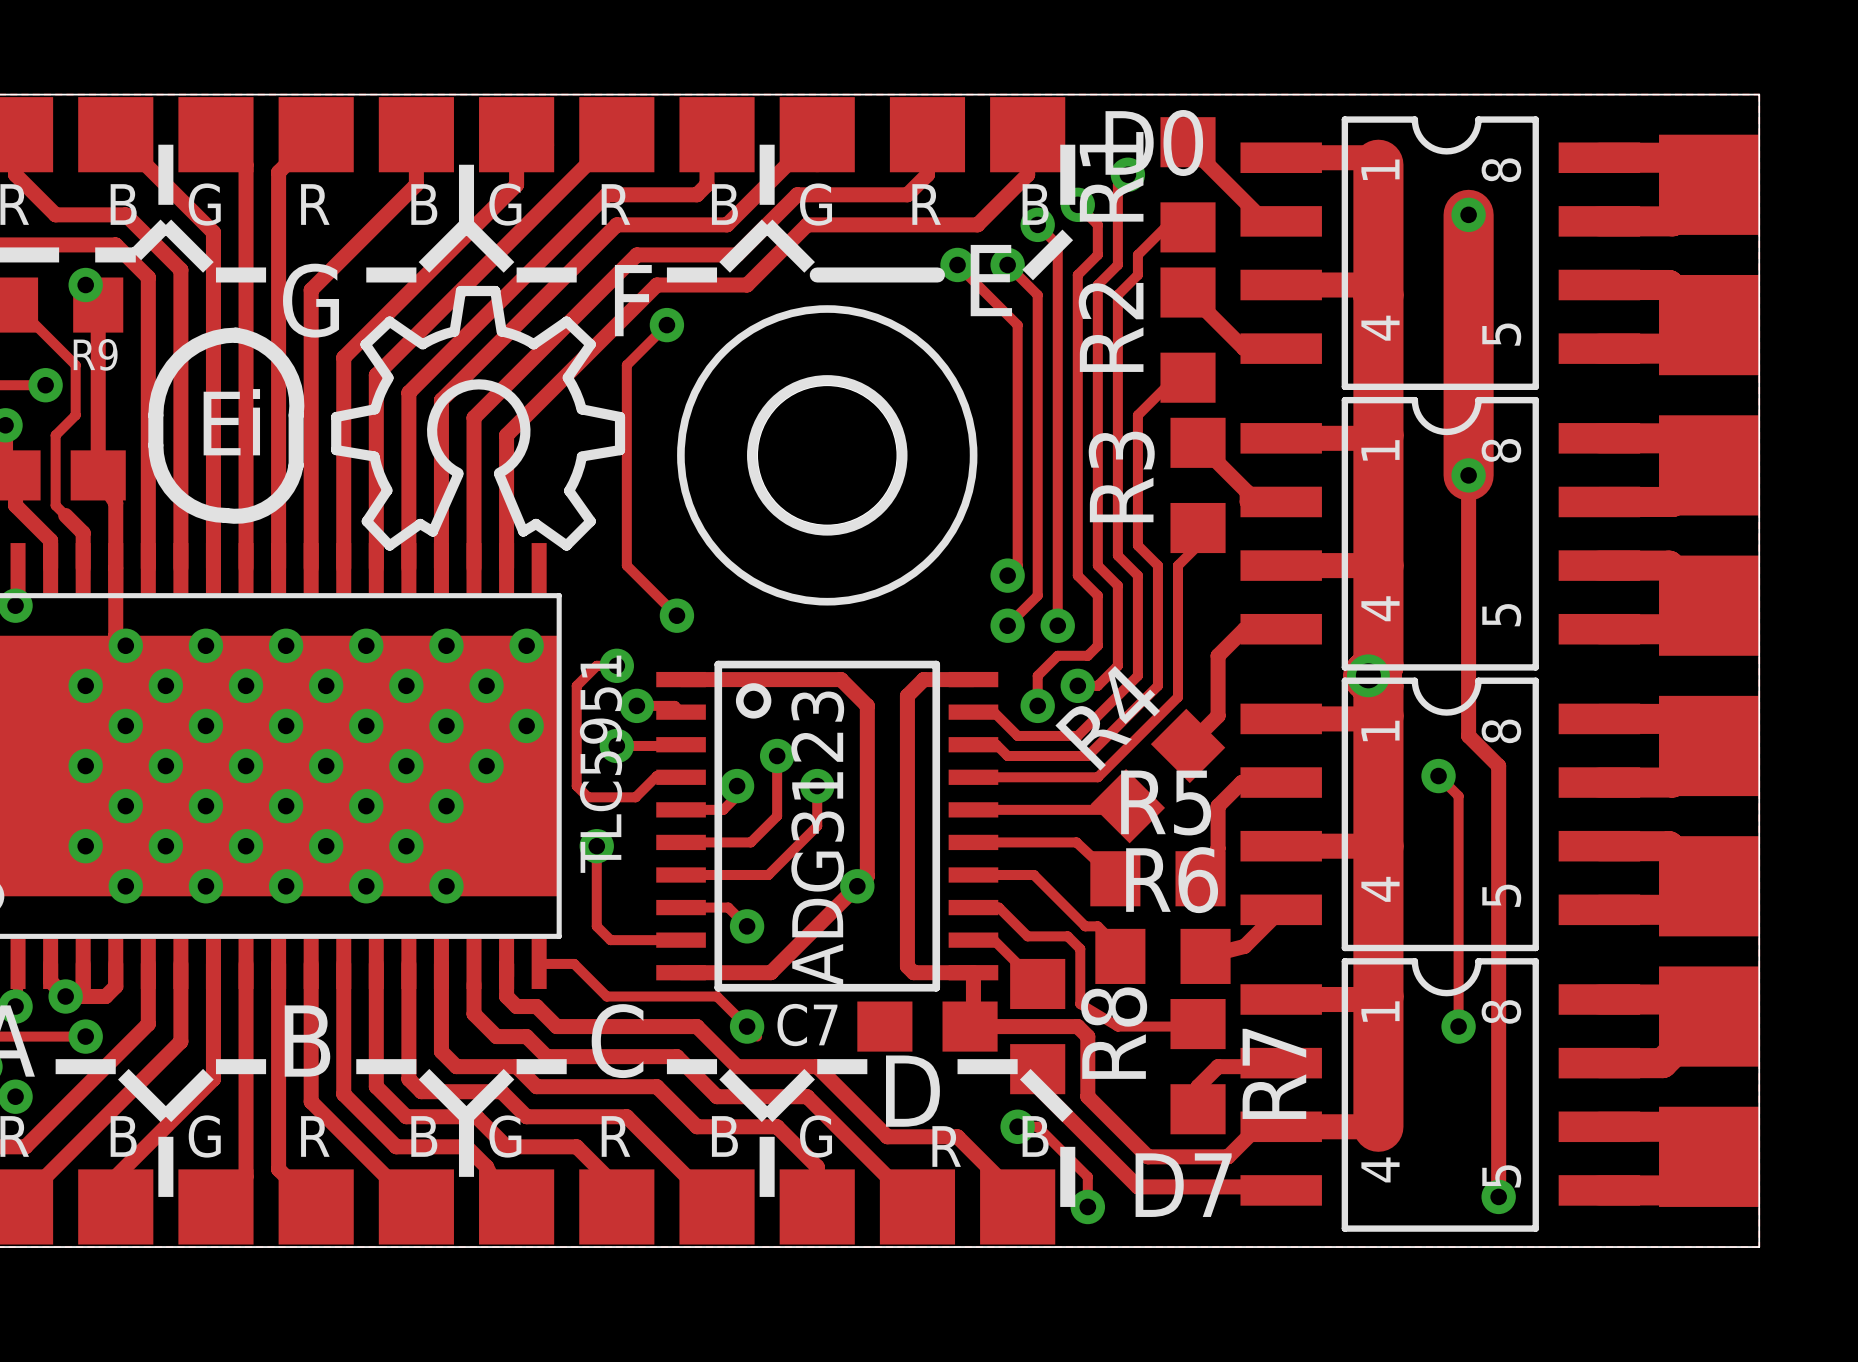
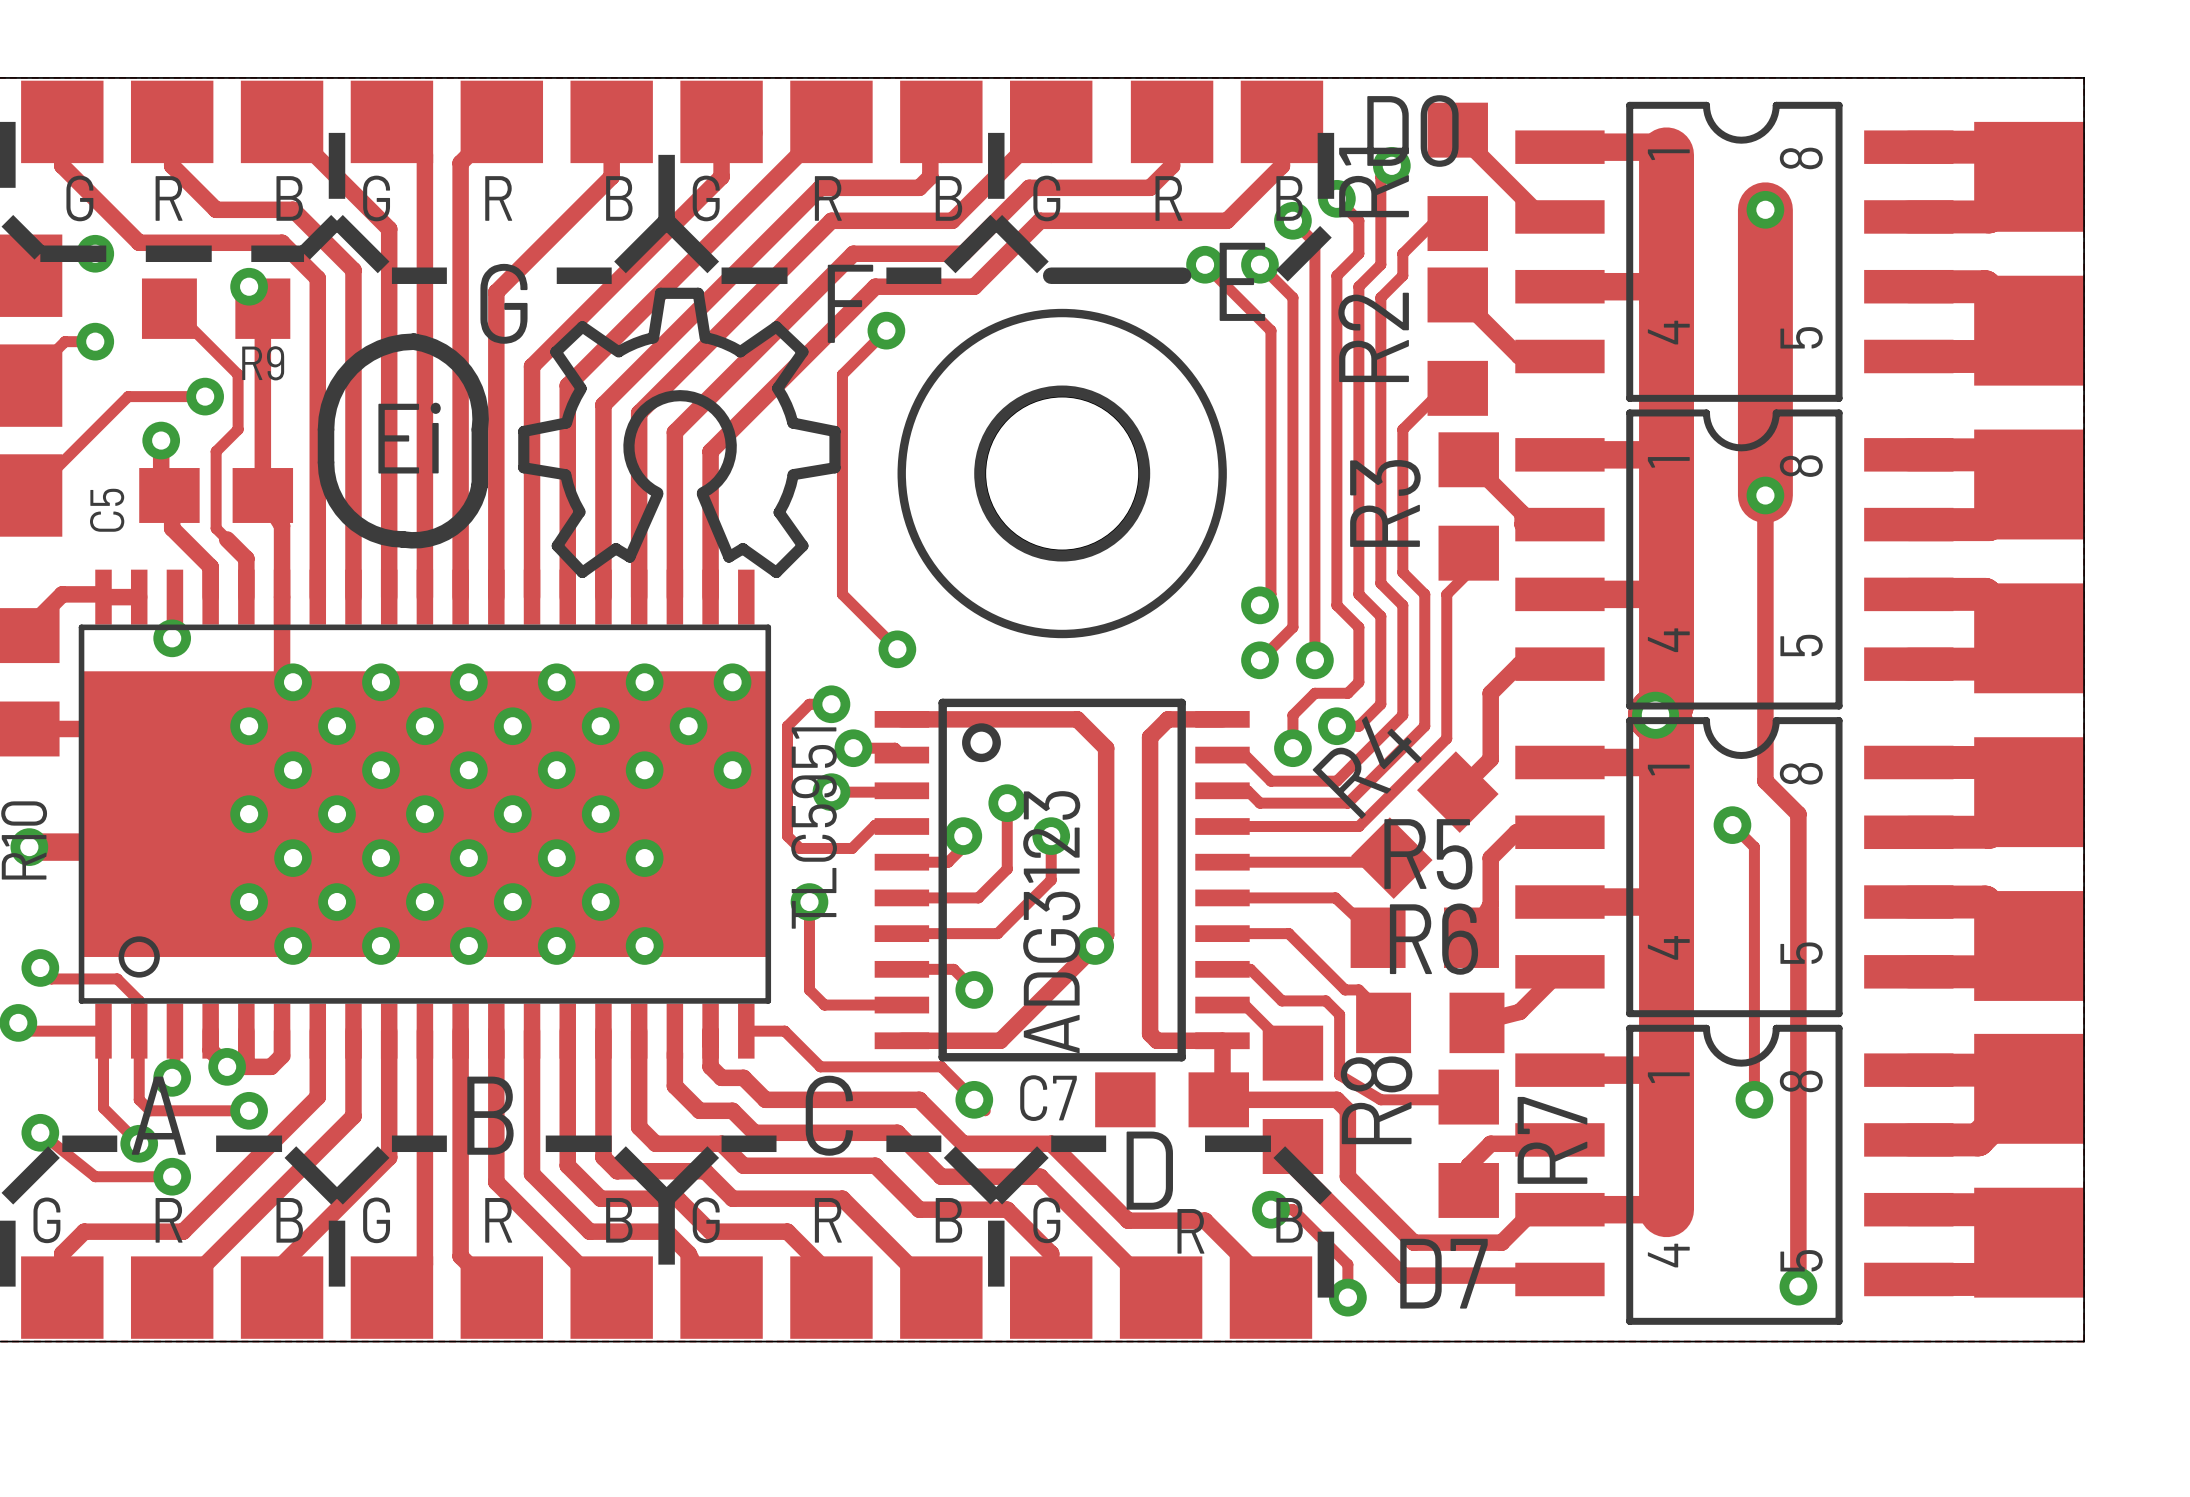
via: (486, 766) -> none

